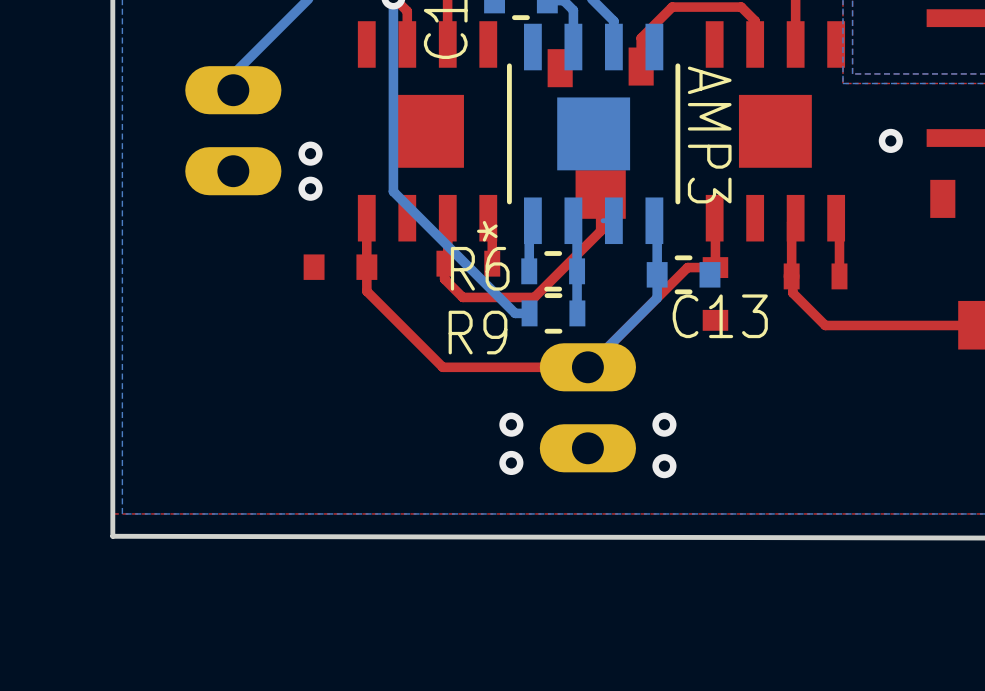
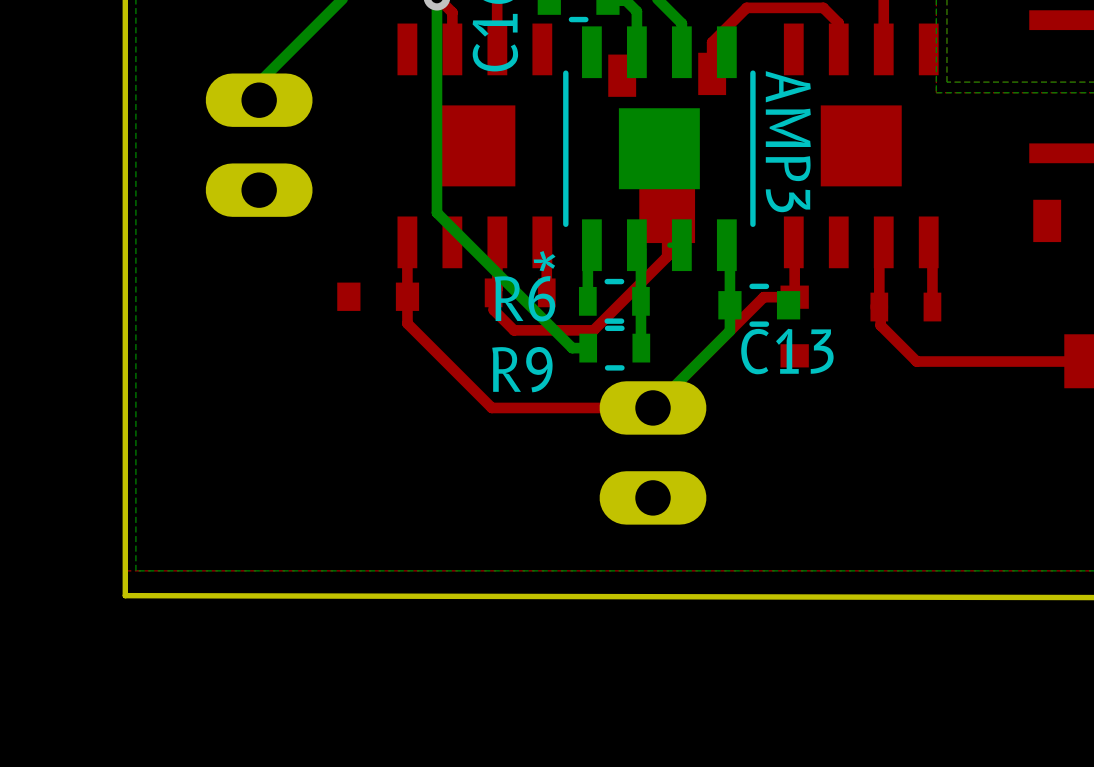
via: (890, 140) -> none
via: (310, 153) -> none
via: (310, 188) -> none
via: (511, 424) -> none
via: (664, 424) -> none
via: (511, 462) -> none
via: (664, 466) -> none

